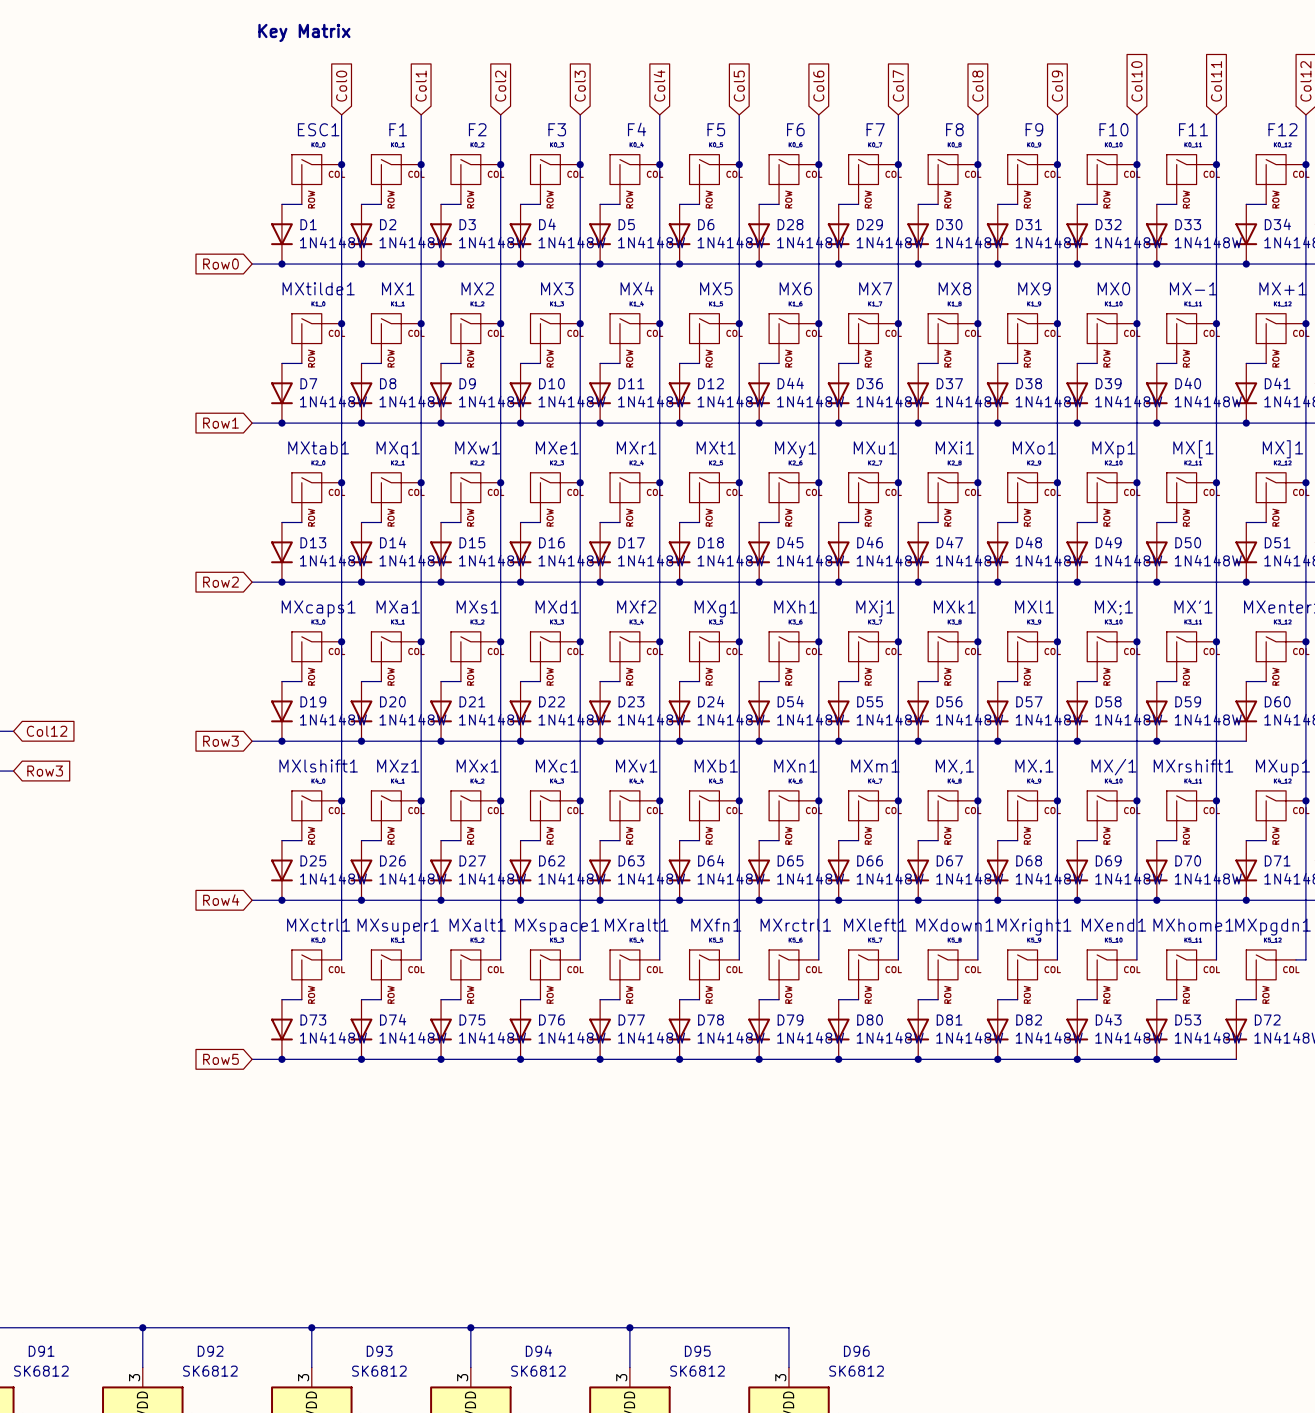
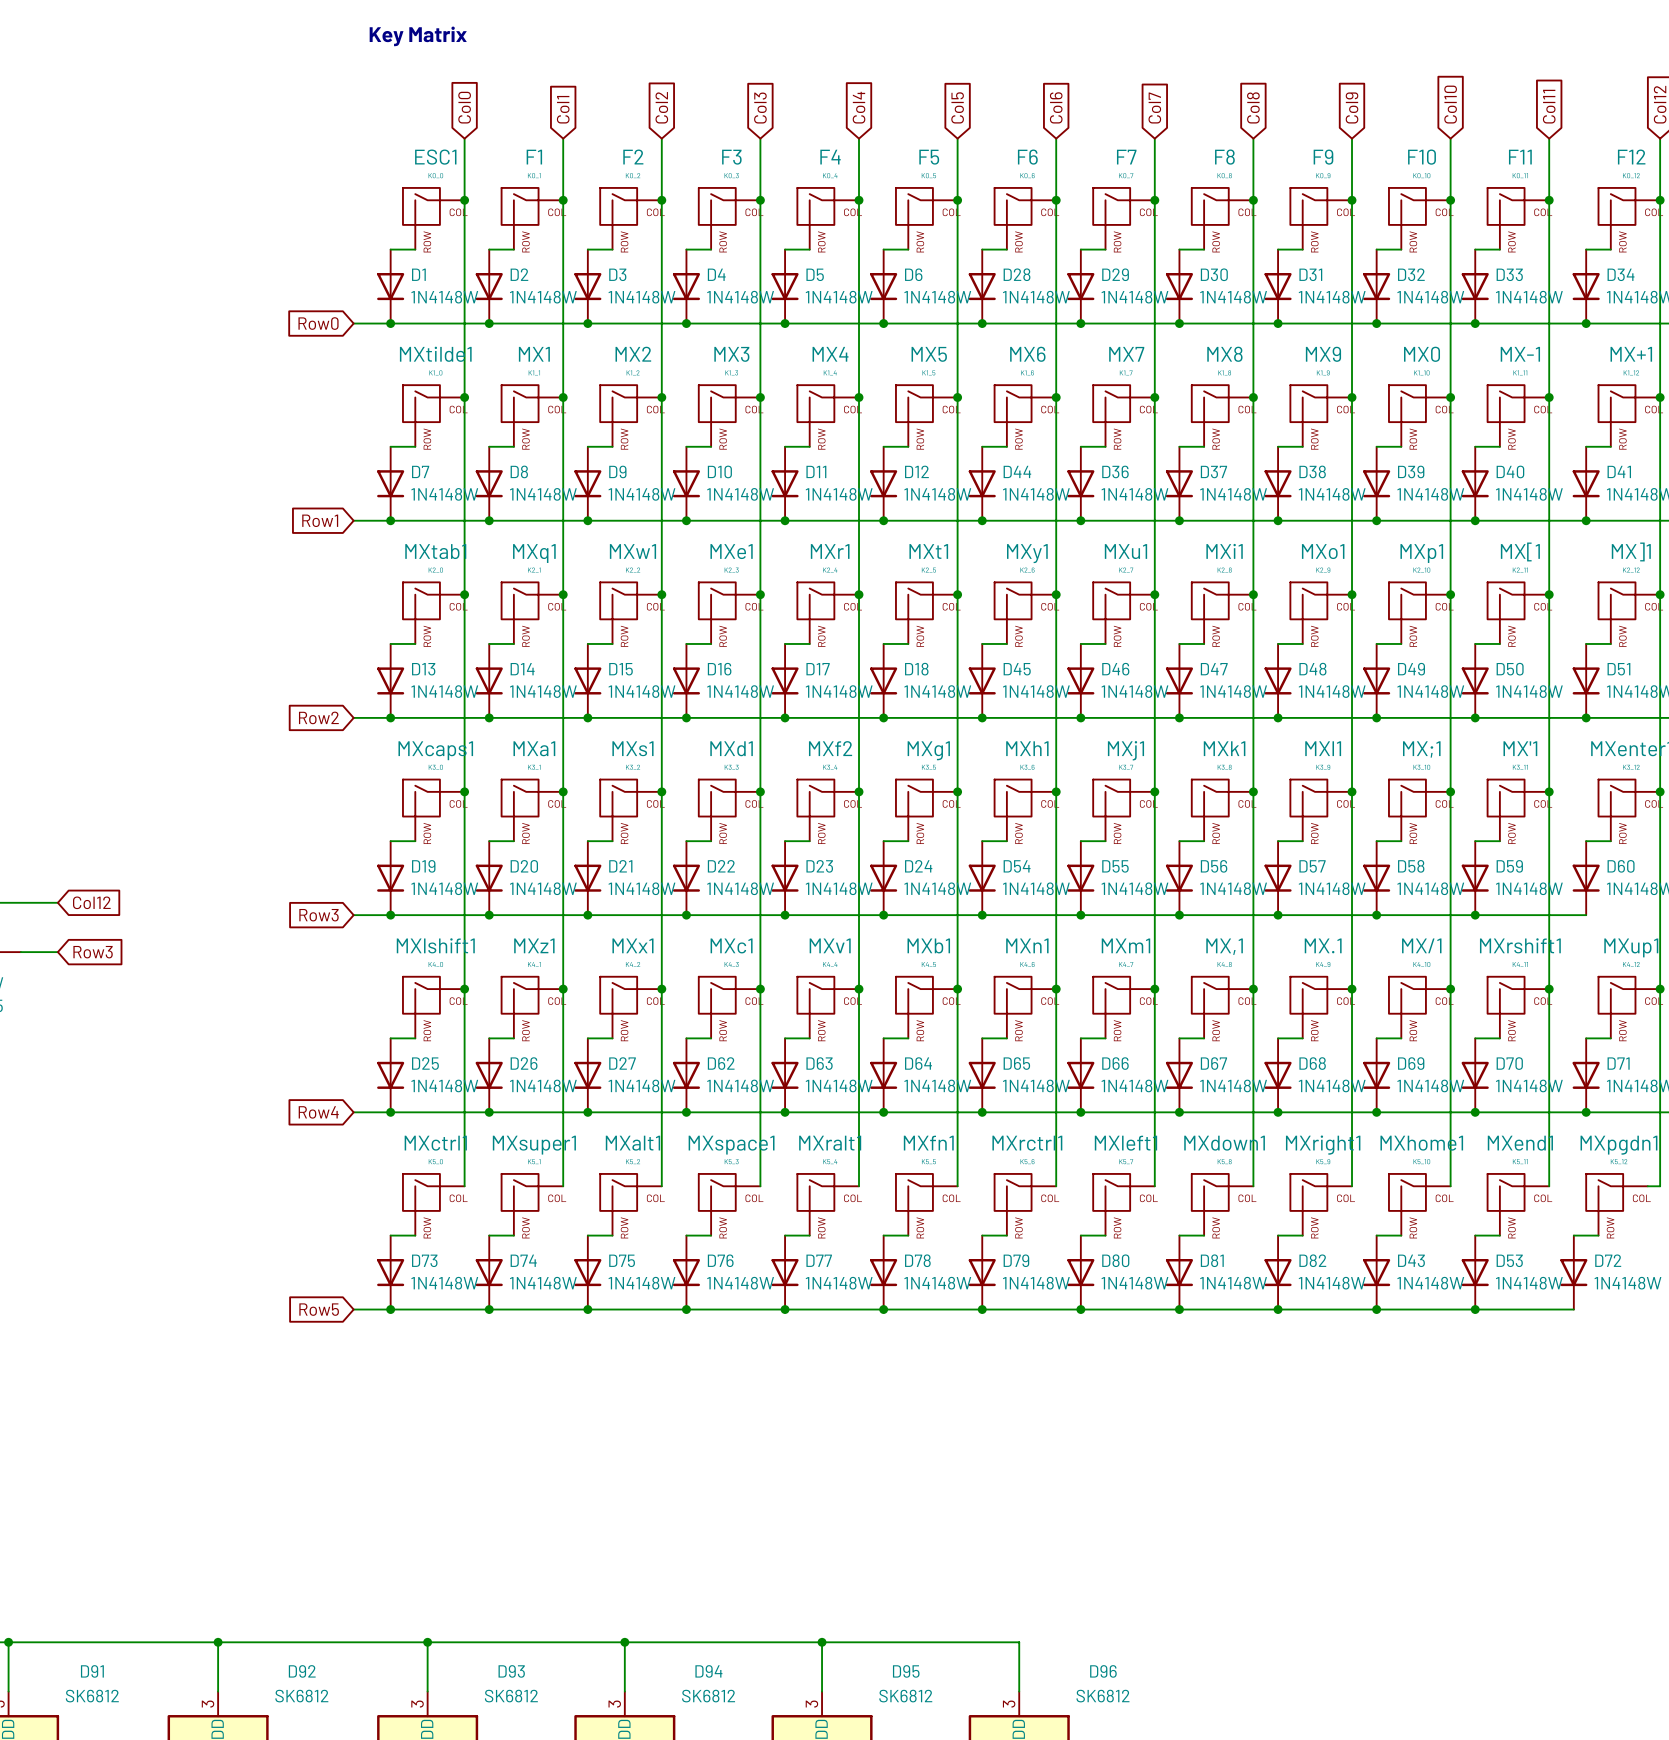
MXend1 name: MXend1 (1113, 925) -> MXhome1 (1421, 1143)
MXhome1 name: MXhome1 (1193, 925) -> MXend1 (1520, 1143)

